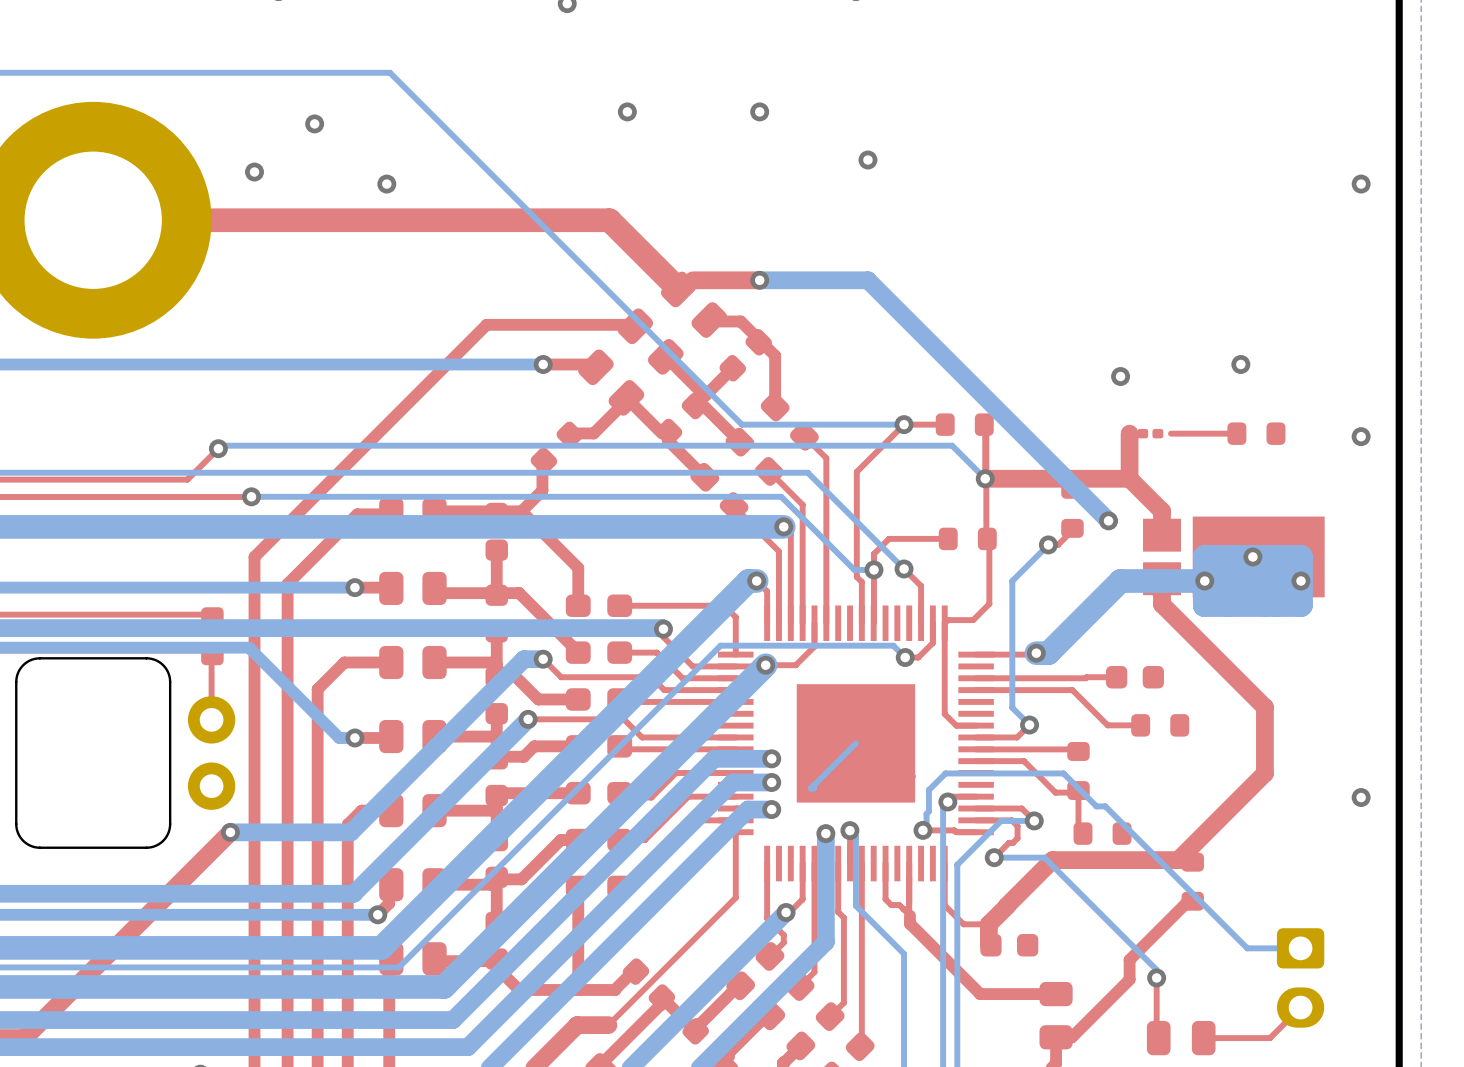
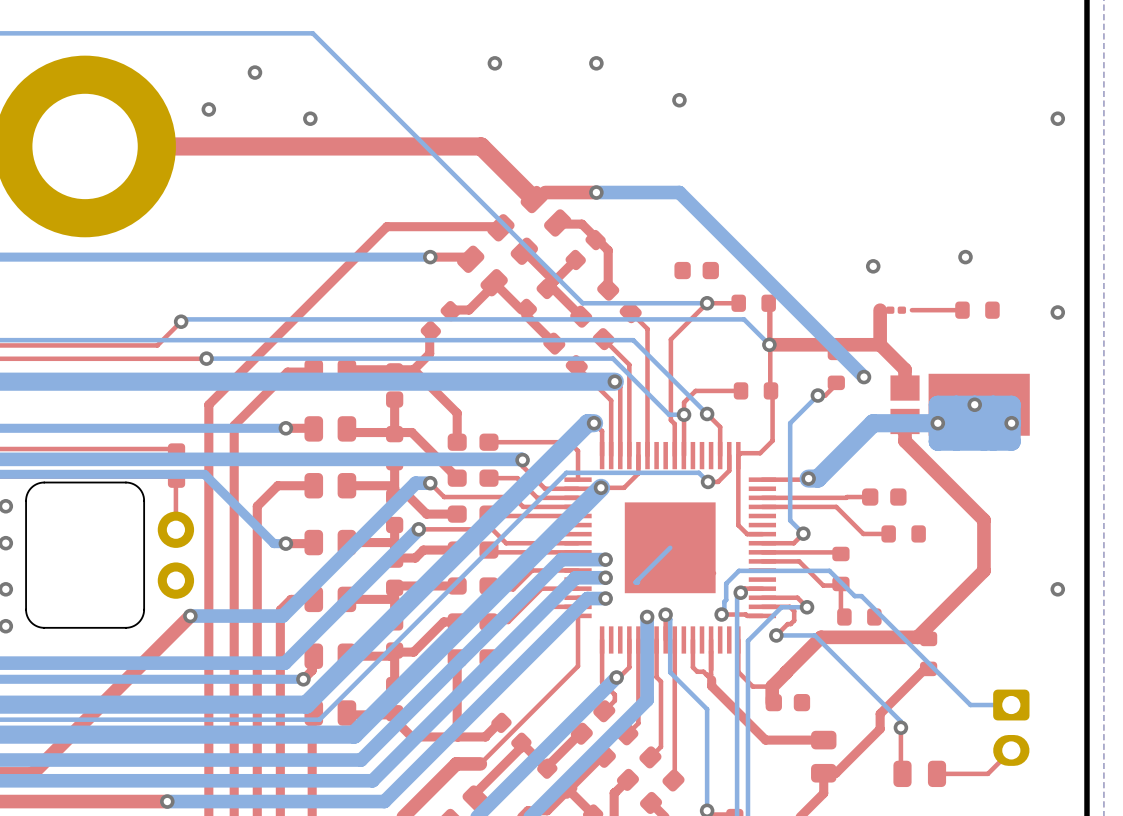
part: none -> (696, 270)

